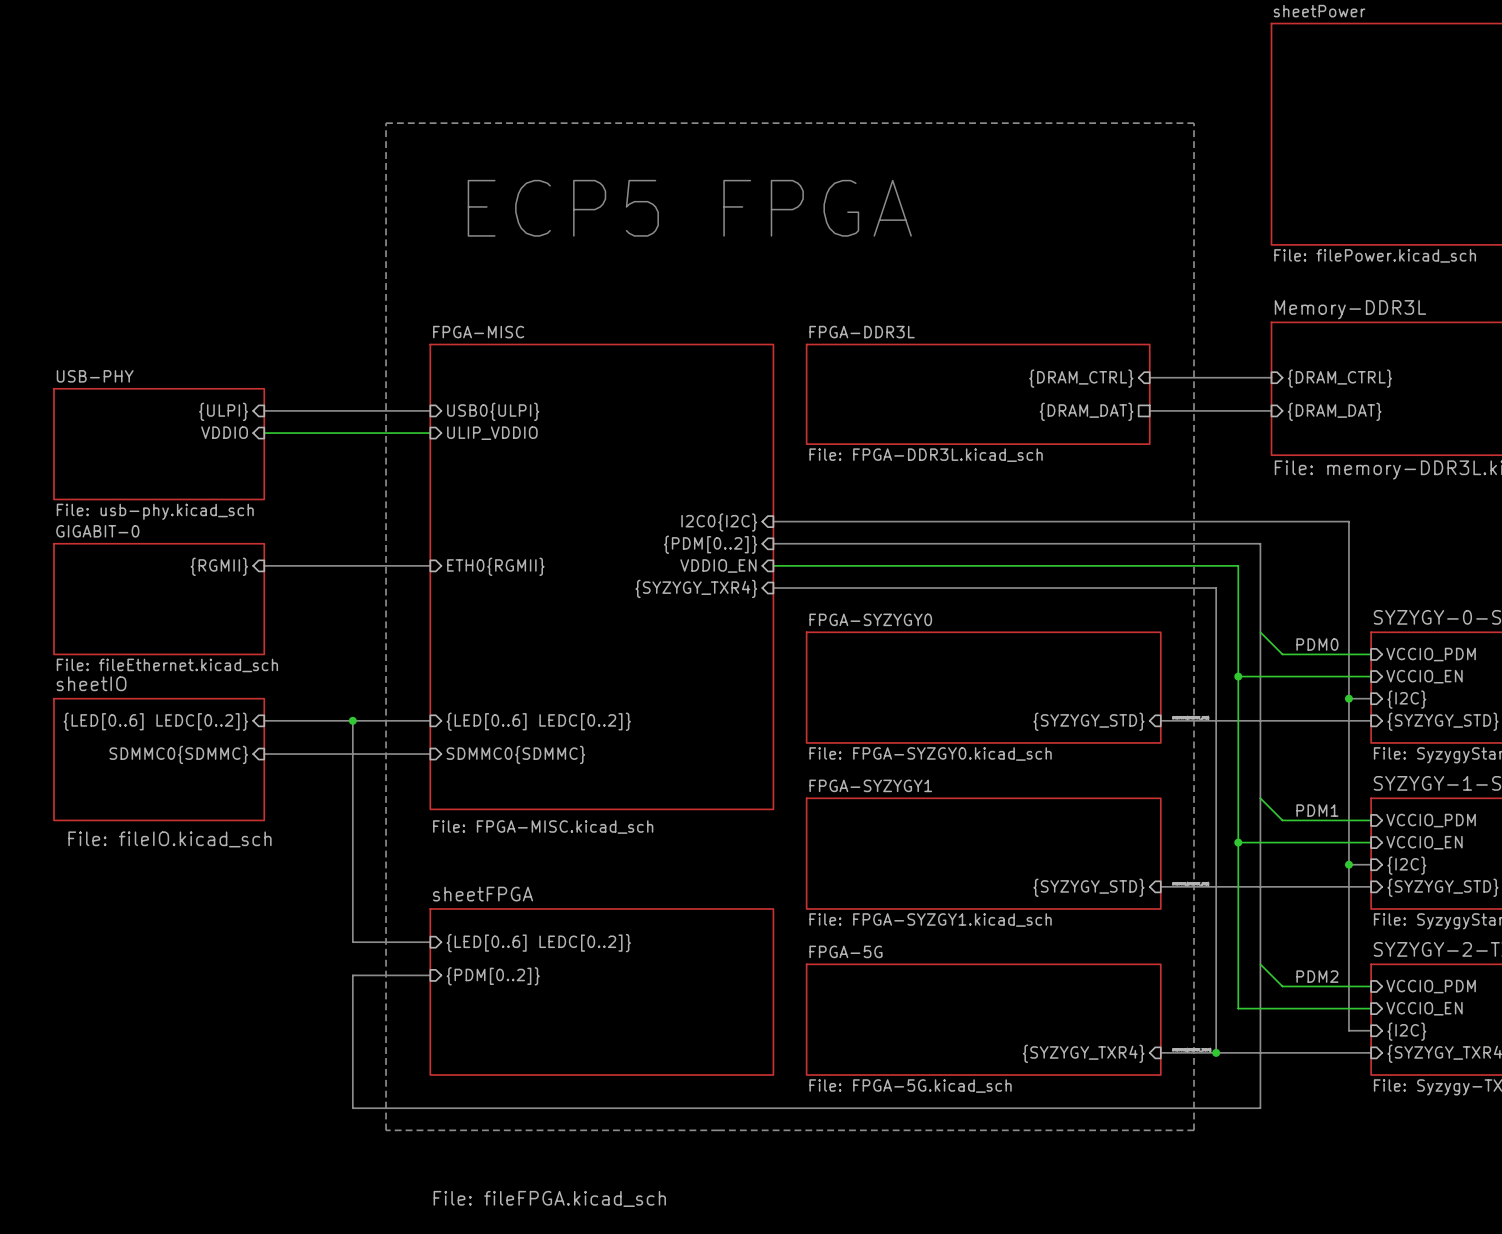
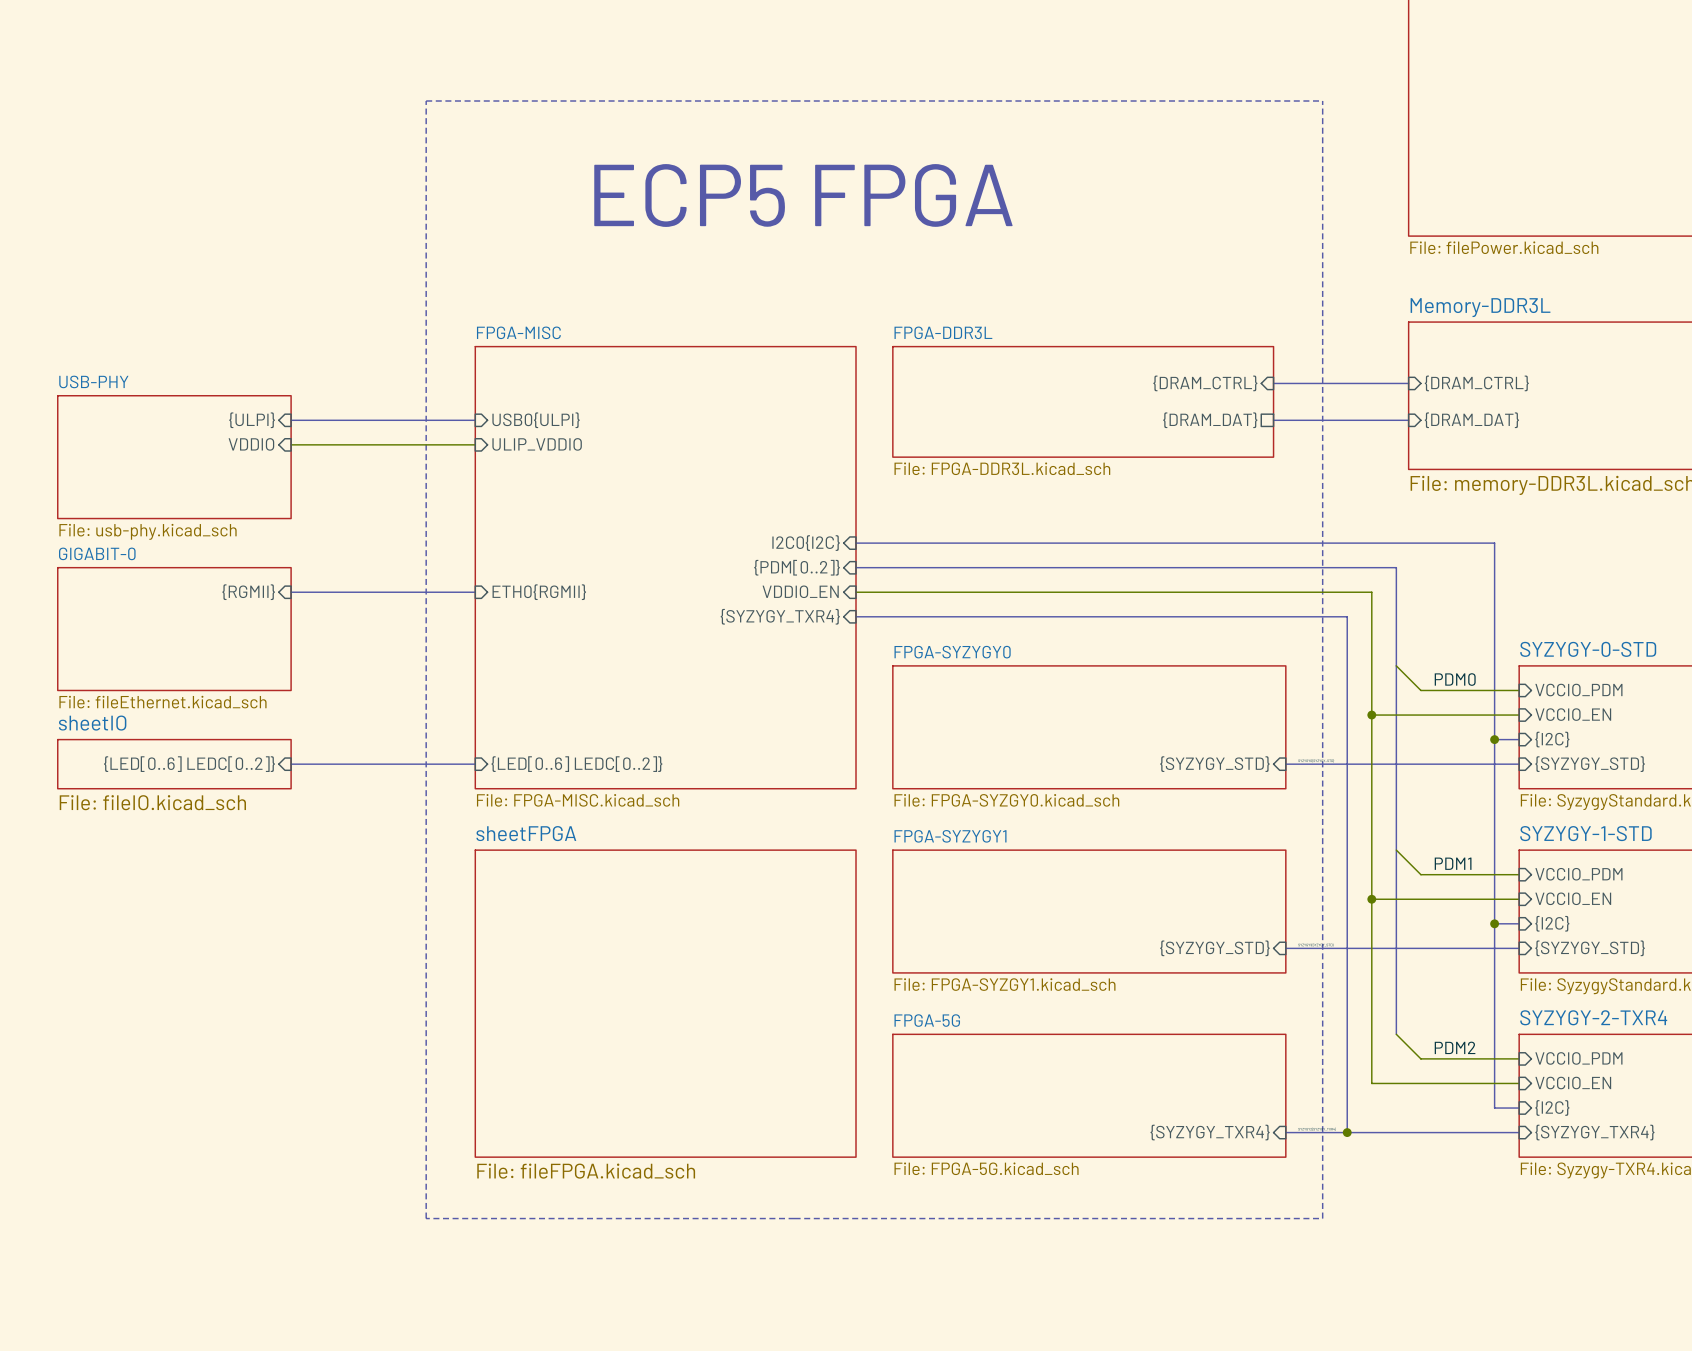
sheet FPGA-MISC: none -> File: FPGA-MISC.kicad_sch (665, 567)
sheet FPGA-MISC: File: FPGA-MISC.kicad_sch (601, 576) -> none
sheet sheetIO: none -> File: fileIO.kicad_sch (174, 764)
bus: (352, 720) (352, 942) (430, 942) -> none
junction: (352, 720) -> none
sheet pin: SDMMC0{SDMMC} (178, 754) -> none
bus: (264, 754) (430, 754) -> none
sheet pin: SDMMC0{SDMMC} (515, 754) -> none
sheet sheetIO: File: fileIO.kicad_sch (159, 759) -> none
sheet sheetFPGA: none -> File: fileFPGA.kicad_sch (665, 1003)
sheet pin: {LED[0..6] LEDC[0..2]} (538, 943) -> none
bus: (1260, 964) (1260, 1108) (352, 1108) (352, 975) (430, 975) -> none
sheet pin: {PDM[0..2]} (493, 976) -> none
sheet sheetFPGA: File: fileFPGA.kicad_sch (601, 992) -> none

